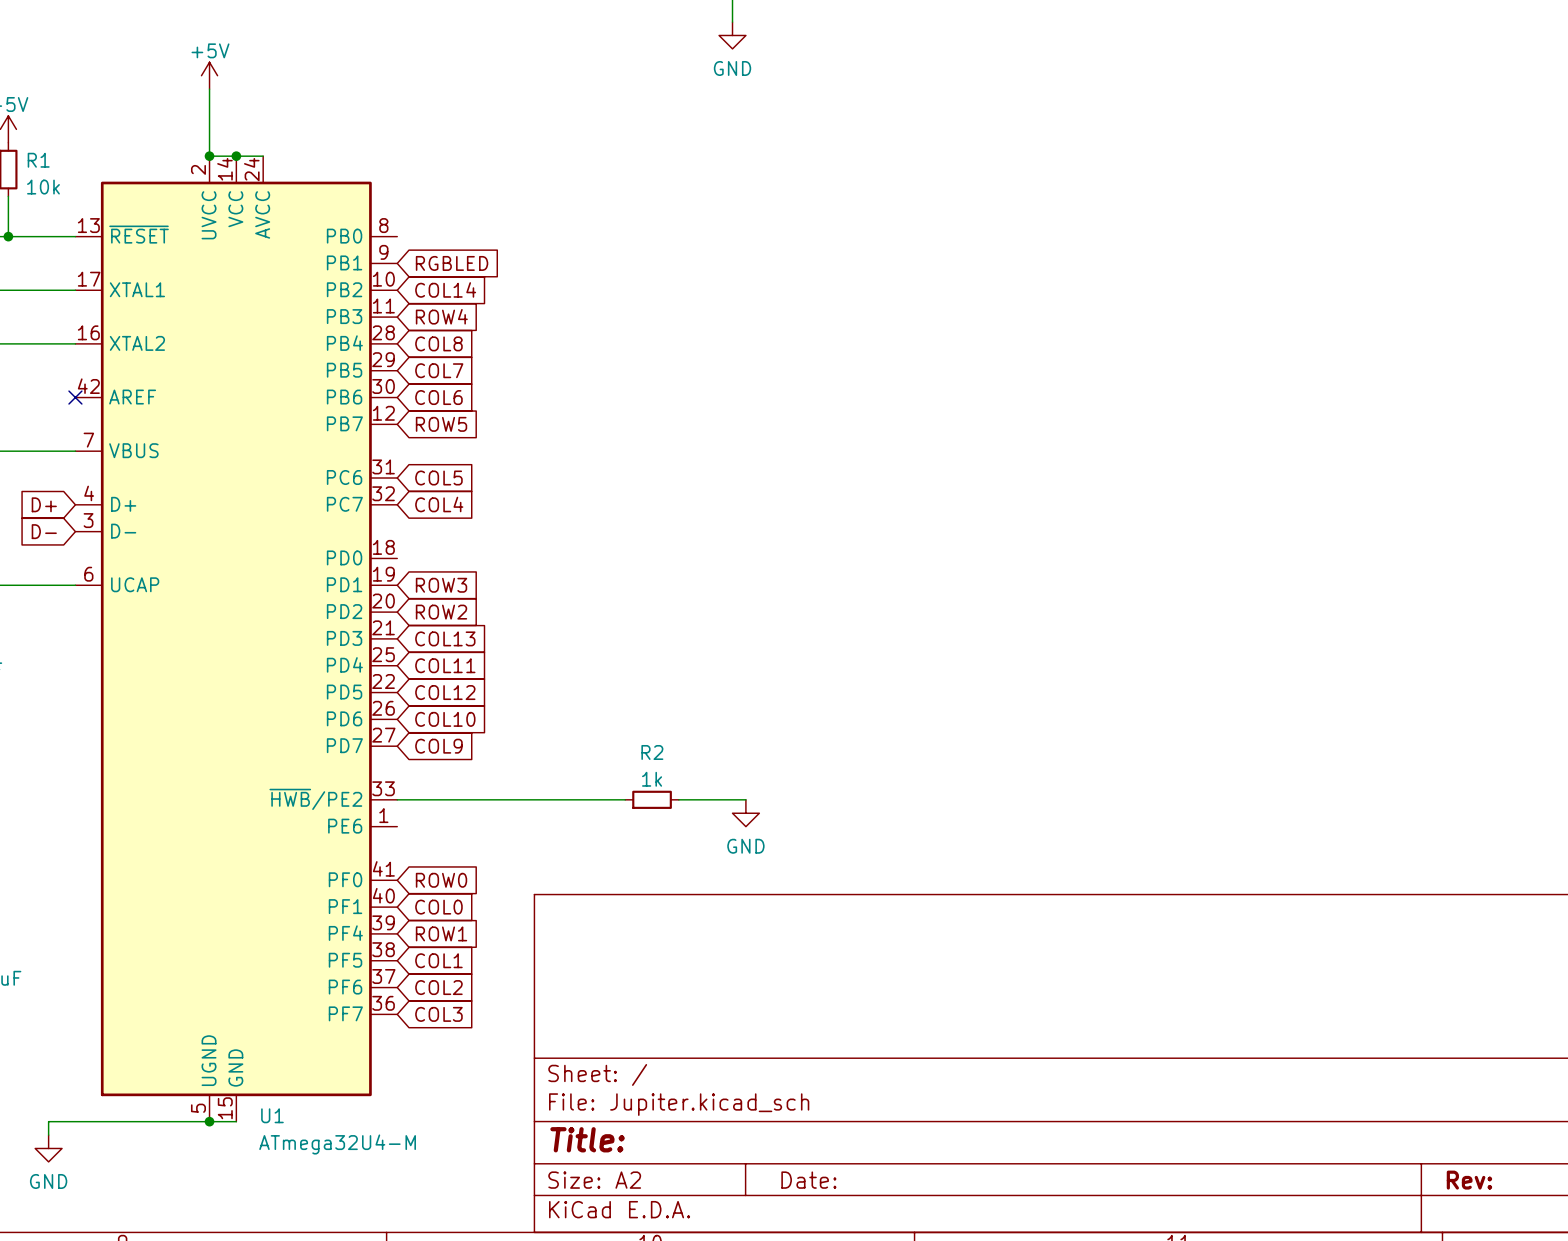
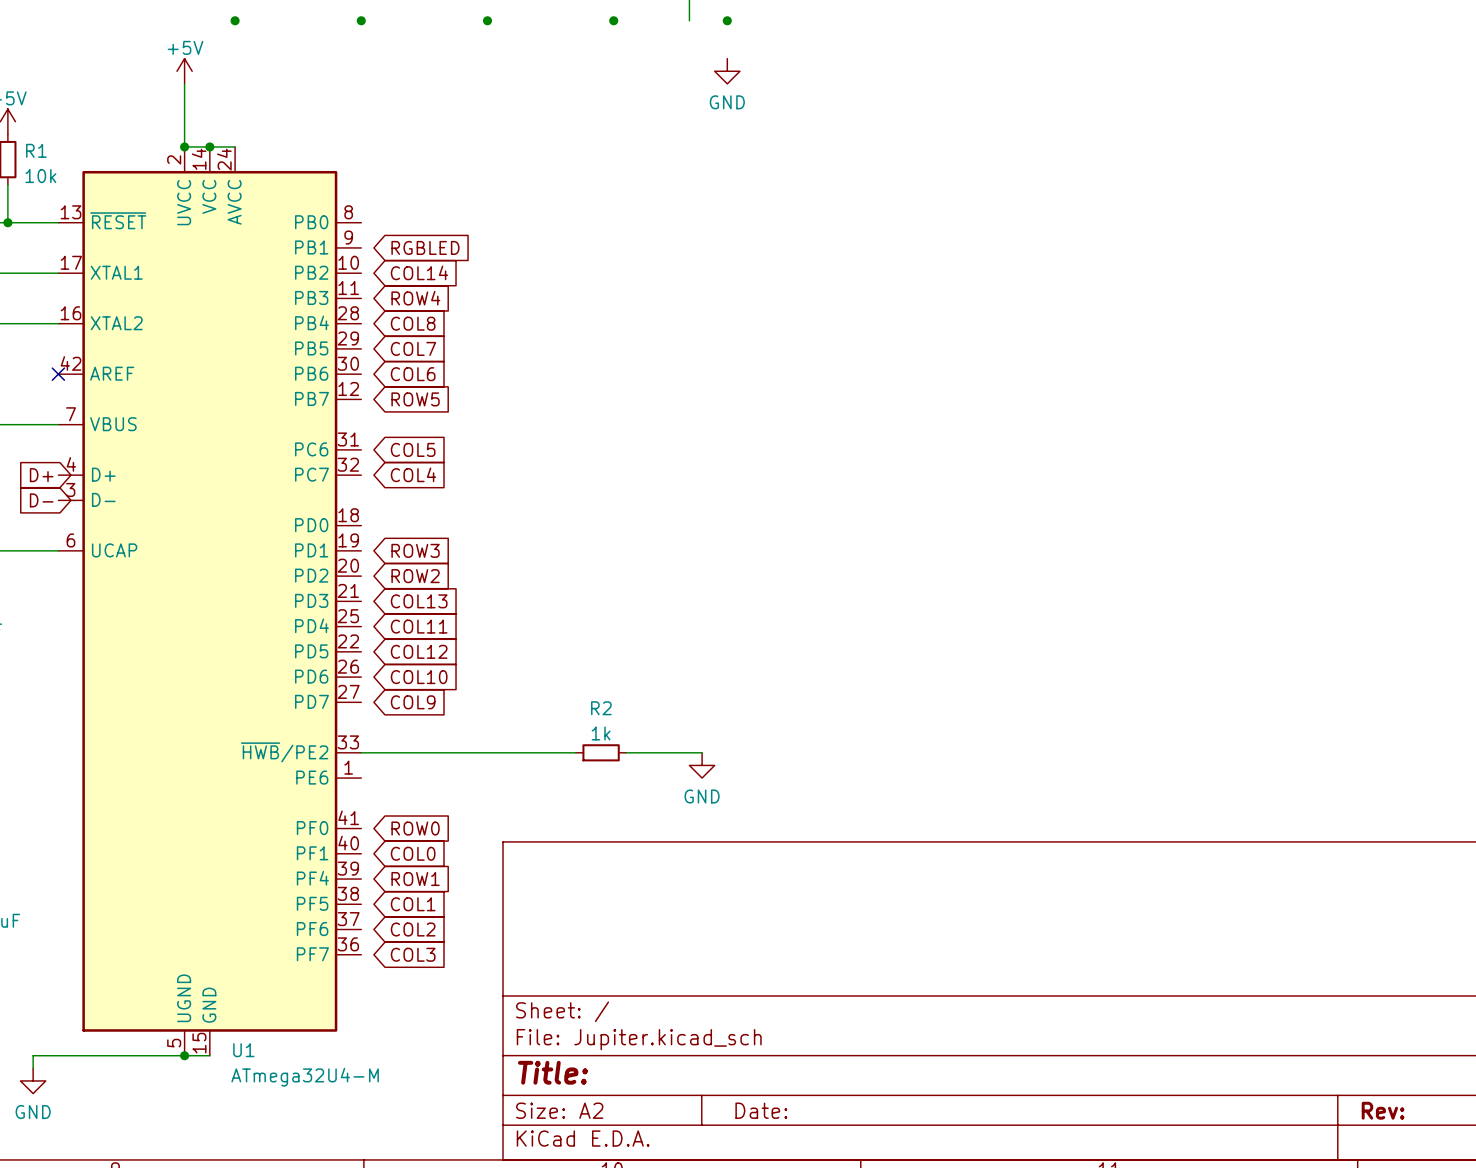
junction: none -> (235, 20)
junction: none -> (361, 20)
junction: none -> (487, 20)
junction: none -> (613, 20)
junction: none -> (727, 20)
power symbol position: GND (732, 35) -> GND (727, 71)
power symbol position: +5V (209, 75) -> +5V (184, 71)
wire: (209, 89) (209, 156) -> (184, 83) (184, 146) (197, 146)
junction: none -> (184, 146)
junction: (209, 156) -> none
junction: none -> (209, 146)
junction: (236, 156) -> none
wire: (249, 156) (263, 156) -> none
no-connect mark position: (75, 397) -> (58, 374)
U1 position: (236, 638) -> (209, 601)
R2 position: (652, 799) -> (601, 752)
wire: (48, 1121) (48, 1135) -> (45, 1055) (33, 1055) (33, 1068)
junction position: (209, 1121) -> (184, 1055)
wire: (222, 1121) (236, 1121) -> none
power symbol position: GND (48, 1148) -> GND (33, 1080)

